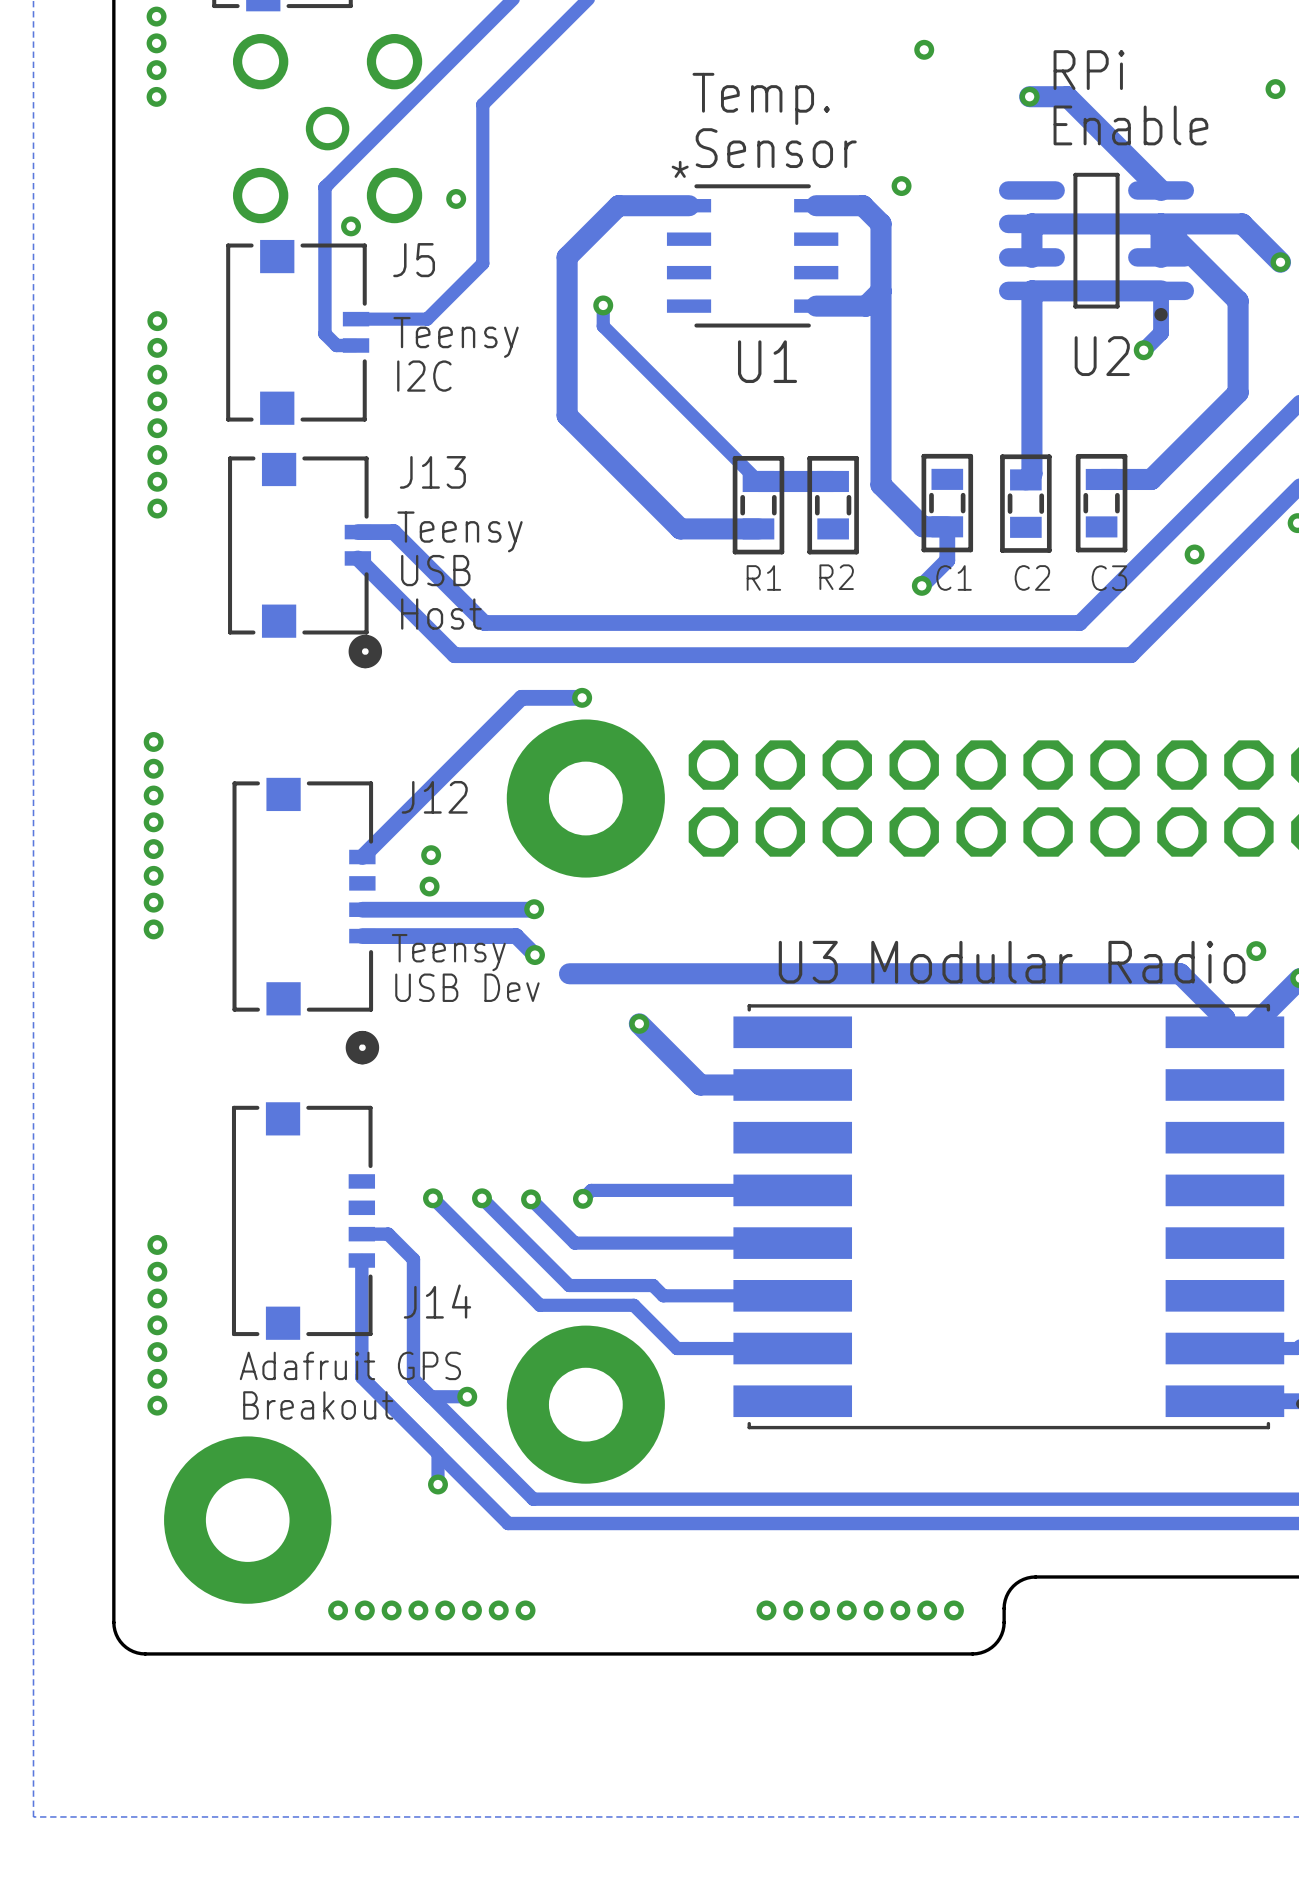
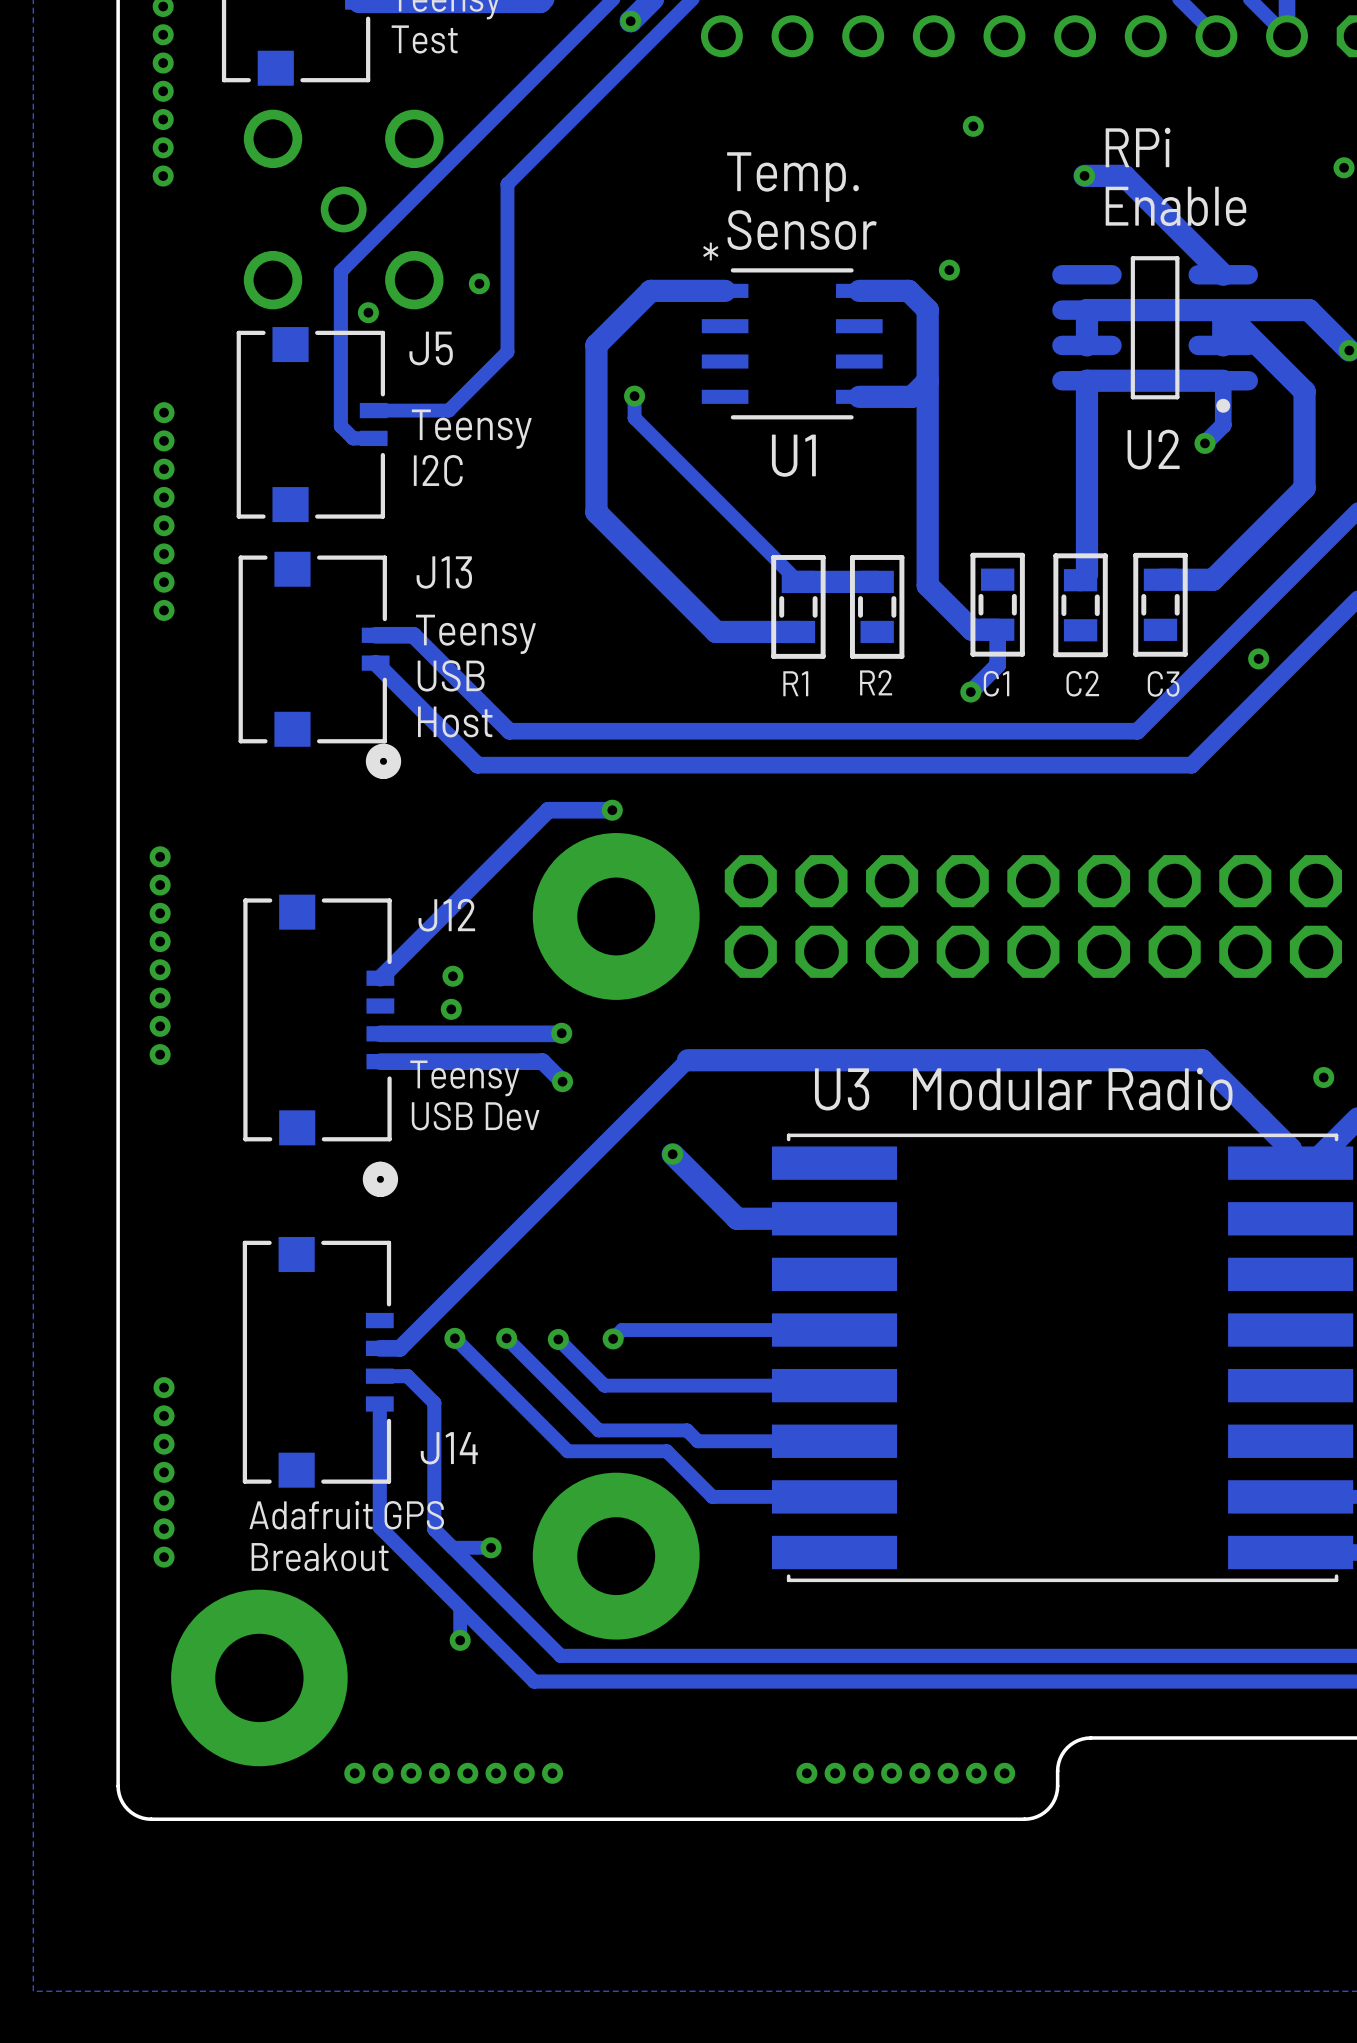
track: (1180, 973) (569, 973) -> (1243, 1101) (1202, 1060) (687, 1060) (399, 1348) (379, 1348)

